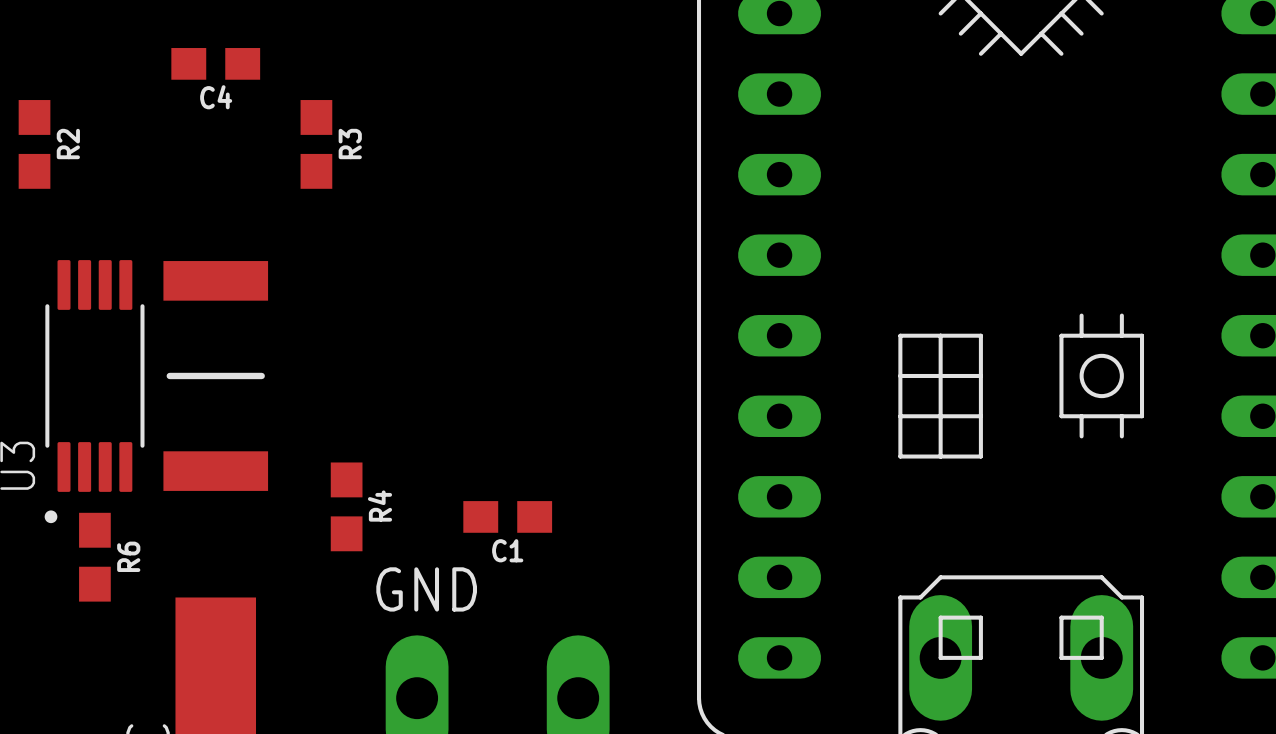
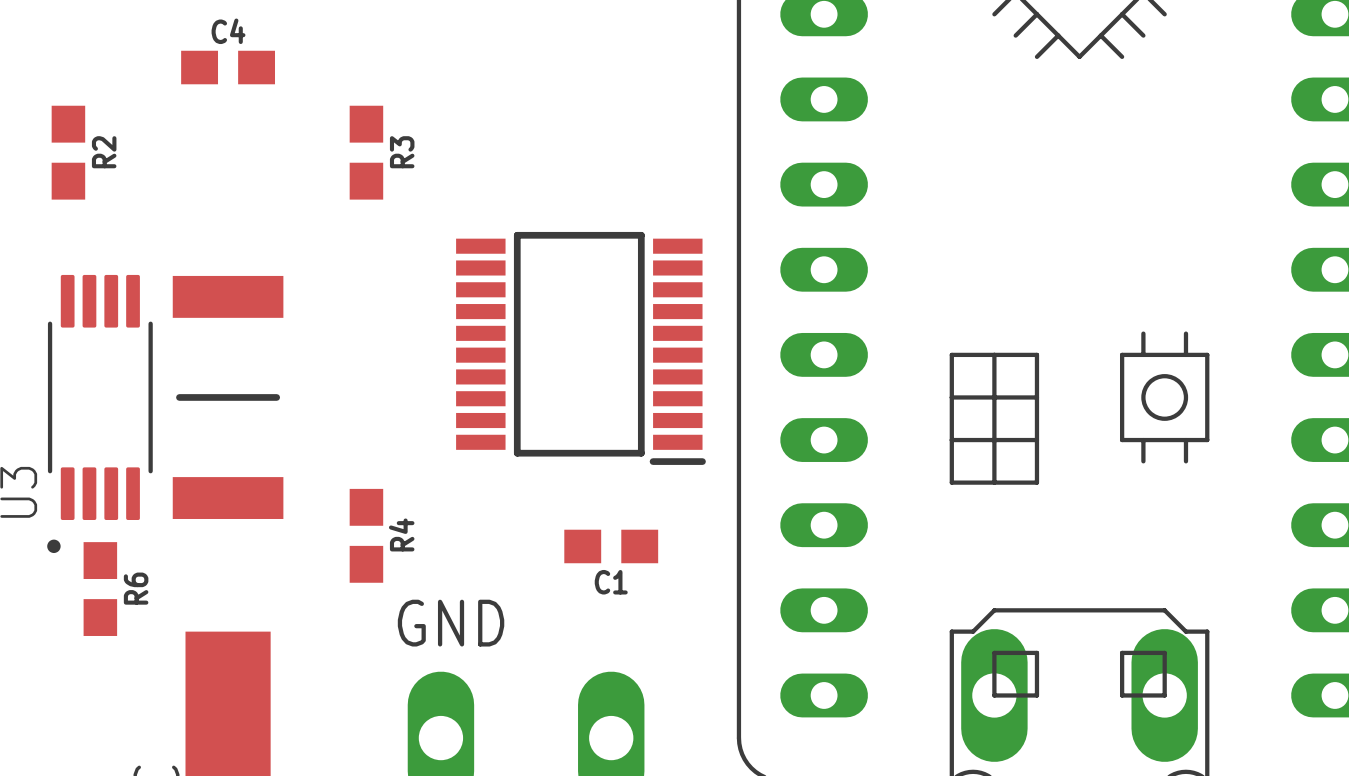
C4 name position: C4 (216, 97) -> C4 (228, 31)
R2 position: (34, 144) -> (68, 152)
R3 position: (316, 144) -> (366, 152)
part: none -> (580, 348)
C1 position: (507, 516) -> (611, 546)

